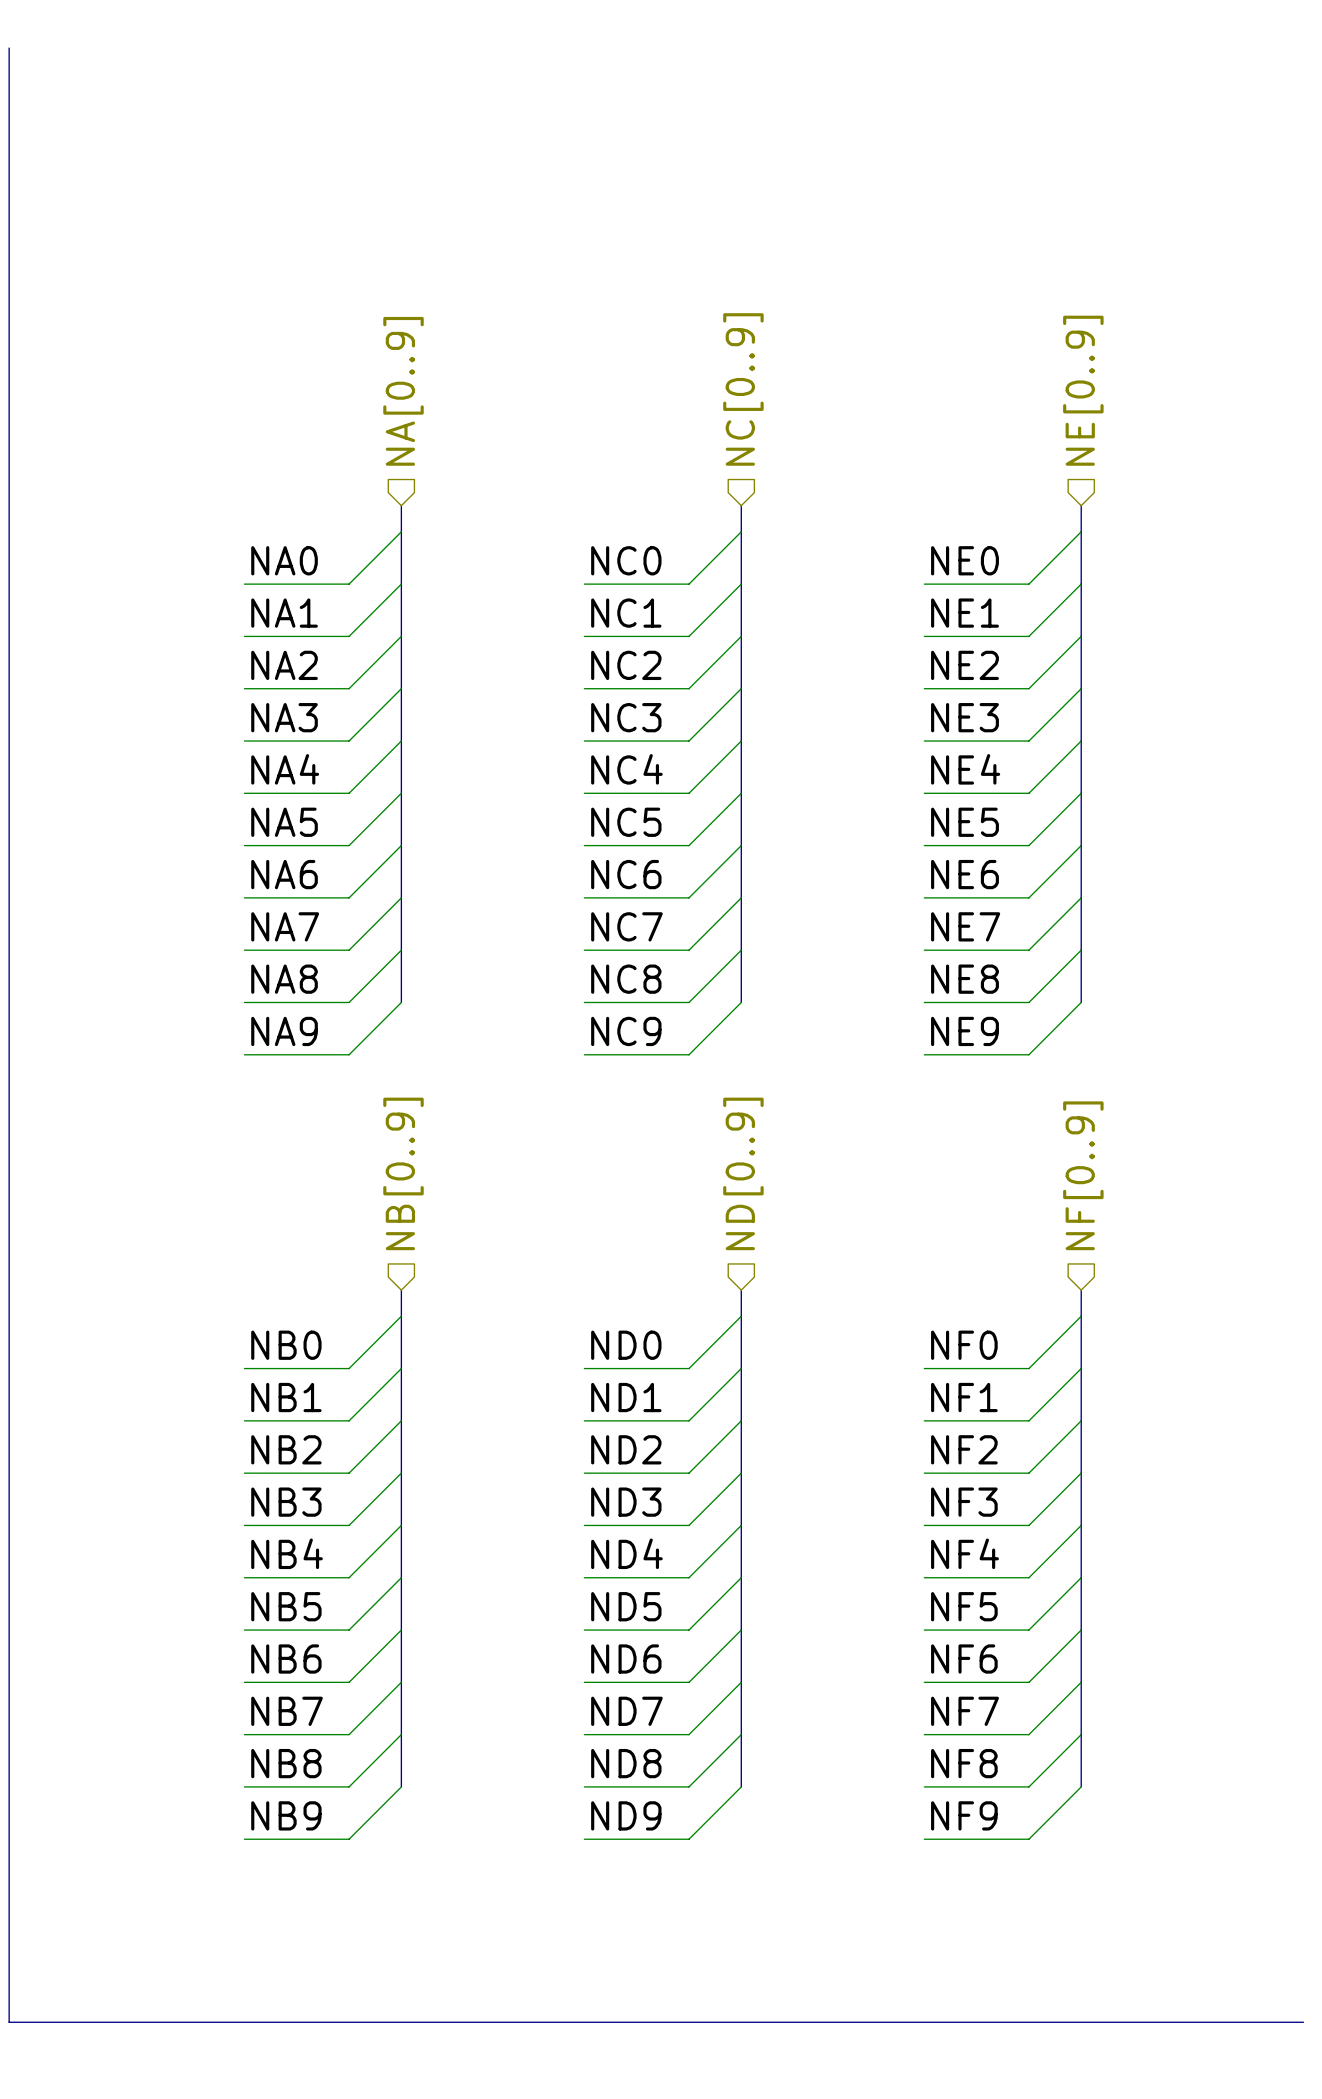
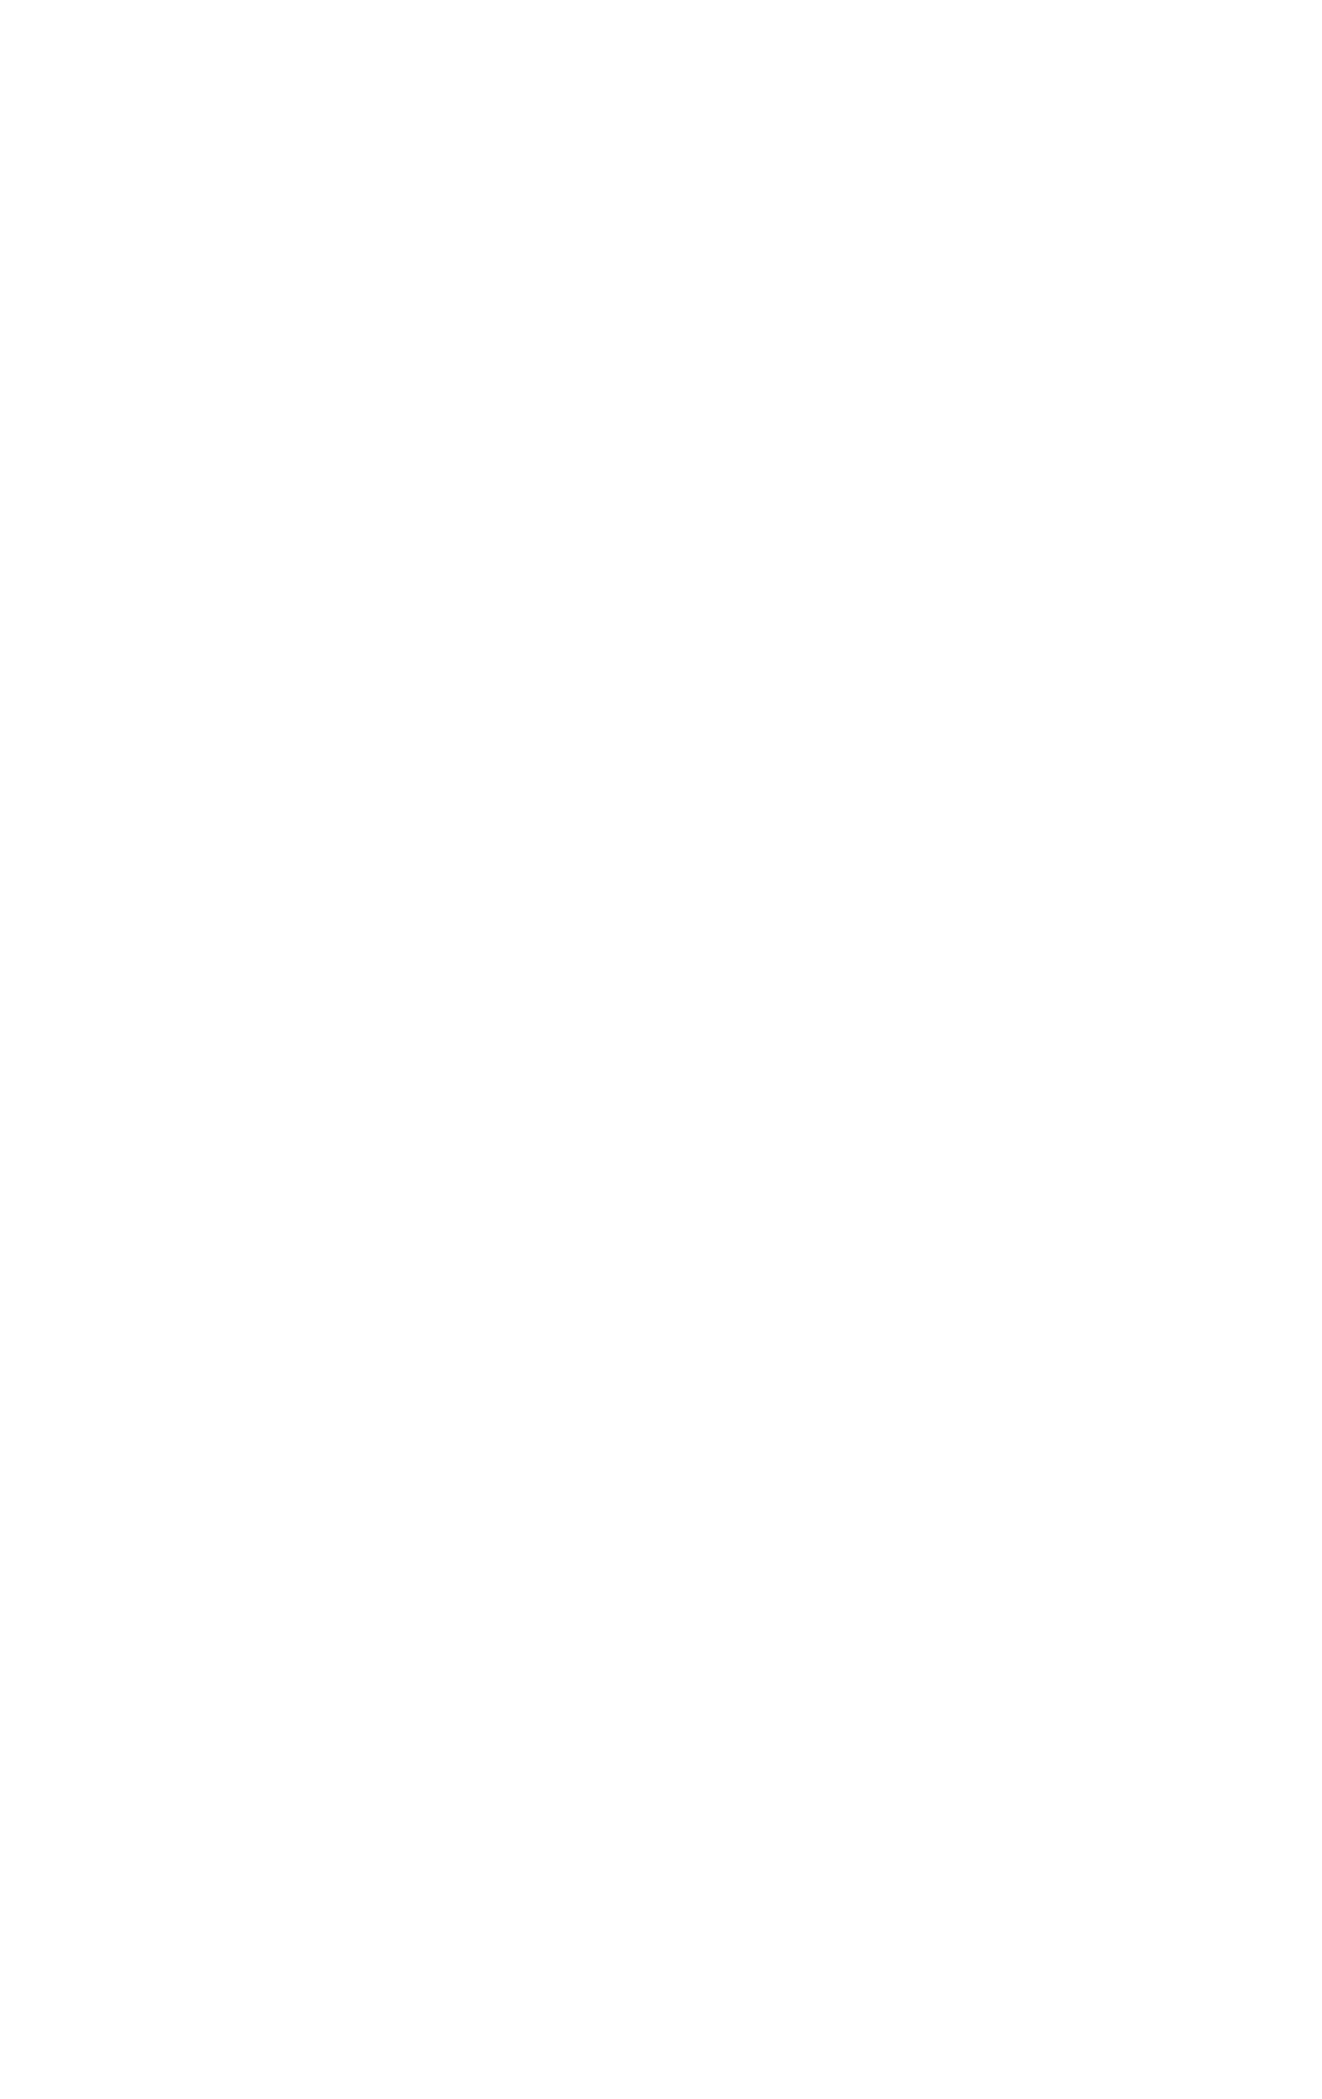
line: (9, 48) (9, 2022) (1303, 2022) -> none
hierarchical label: NC[0..9] (743, 389) -> none
hierarchical label: NE[0..9] (1083, 390) -> none
hierarchical label: NA[0..9] (403, 391) -> none
bus: (401, 505) (401, 1002) -> none
bus: (741, 505) (741, 1002) -> none
bus: (1081, 505) (1081, 1002) -> none
wire: (401, 531) (349, 584) (244, 584) -> none
wire: (741, 531) (689, 584) (584, 584) -> none
wire: (1081, 531) (1028, 584) (924, 584) -> none
label: NA0 (284, 560) -> none
label: NC0 (626, 560) -> none
label: NE0 (964, 560) -> none
wire: (401, 584) (349, 636) (244, 636) -> none
wire: (741, 584) (689, 636) (584, 636) -> none
wire: (1081, 584) (1028, 636) (924, 636) -> none
label: NA1 (284, 613) -> none
label: NC1 (626, 613) -> none
label: NE1 (964, 613) -> none
wire: (401, 636) (349, 688) (244, 688) -> none
wire: (741, 636) (689, 688) (584, 688) -> none
wire: (1081, 636) (1028, 688) (924, 688) -> none
label: NA2 (284, 665) -> none
label: NC2 (626, 665) -> none
label: NE2 (964, 665) -> none
wire: (401, 688) (349, 741) (244, 741) -> none
wire: (741, 688) (689, 741) (584, 741) -> none
wire: (1081, 688) (1028, 741) (924, 741) -> none
label: NA3 (284, 717) -> none
label: NC3 (626, 717) -> none
label: NE3 (964, 717) -> none
wire: (401, 741) (349, 793) (244, 793) -> none
wire: (741, 741) (689, 793) (584, 793) -> none
wire: (1081, 741) (1028, 793) (924, 793) -> none
label: NA4 (285, 769) -> none
label: NC4 (626, 769) -> none
label: NE4 (965, 769) -> none
wire: (401, 793) (349, 845) (244, 845) -> none
wire: (741, 793) (689, 845) (584, 845) -> none
wire: (1081, 793) (1028, 845) (924, 845) -> none
label: NA5 (284, 822) -> none
label: NC5 (626, 822) -> none
label: NE5 (964, 822) -> none
wire: (401, 845) (349, 897) (244, 897) -> none
wire: (741, 845) (689, 897) (584, 897) -> none
wire: (1081, 845) (1028, 897) (924, 897) -> none
label: NA6 (284, 874) -> none
label: NC6 (626, 874) -> none
label: NE6 (964, 874) -> none
wire: (401, 897) (349, 950) (244, 950) -> none
wire: (741, 897) (689, 950) (584, 950) -> none
wire: (1081, 897) (1028, 950) (924, 950) -> none
label: NA7 (285, 926) -> none
label: NC7 (626, 926) -> none
label: NE7 (965, 926) -> none
wire: (401, 950) (349, 1002) (244, 1002) -> none
wire: (741, 950) (689, 1002) (584, 1002) -> none
wire: (1081, 950) (1028, 1002) (924, 1002) -> none
label: NA8 (284, 979) -> none
label: NC8 (626, 979) -> none
label: NE8 (964, 979) -> none
wire: (401, 1002) (349, 1054) (244, 1054) -> none
wire: (741, 1002) (689, 1054) (584, 1054) -> none
wire: (1081, 1002) (1028, 1054) (924, 1054) -> none
label: NA9 (284, 1031) -> none
label: NC9 (626, 1031) -> none
label: NE9 (964, 1031) -> none
hierarchical label: NB[0..9] (403, 1173) -> none
hierarchical label: ND[0..9] (743, 1173) -> none
hierarchical label: NF[0..9] (1083, 1175) -> none
bus: (401, 1290) (401, 1786) -> none
bus: (741, 1290) (741, 1786) -> none
bus: (1081, 1290) (1081, 1786) -> none
wire: (401, 1316) (349, 1368) (244, 1368) -> none
wire: (741, 1316) (689, 1368) (584, 1368) -> none
wire: (1081, 1316) (1028, 1368) (924, 1368) -> none
label: NB0 (286, 1345) -> none
label: ND0 (626, 1345) -> none
label: NF0 (964, 1345) -> none
wire: (401, 1368) (349, 1420) (244, 1420) -> none
wire: (741, 1368) (689, 1420) (584, 1420) -> none
wire: (1081, 1368) (1028, 1420) (924, 1420) -> none
label: NB1 (286, 1397) -> none
label: ND1 (626, 1397) -> none
label: NF1 (964, 1397) -> none
wire: (401, 1420) (349, 1473) (244, 1473) -> none
wire: (741, 1420) (689, 1473) (584, 1473) -> none
wire: (1081, 1420) (1028, 1473) (924, 1473) -> none
label: NB2 (286, 1449) -> none
label: ND2 (626, 1449) -> none
label: NF2 (964, 1449) -> none
wire: (401, 1473) (349, 1525) (244, 1525) -> none
wire: (741, 1473) (689, 1525) (584, 1525) -> none
wire: (1081, 1473) (1028, 1525) (924, 1525) -> none
label: NB3 (286, 1502) -> none
label: ND3 (626, 1502) -> none
label: NF3 (964, 1502) -> none
wire: (401, 1525) (349, 1577) (244, 1577) -> none
wire: (741, 1525) (689, 1577) (584, 1577) -> none
wire: (1081, 1525) (1028, 1577) (924, 1577) -> none
label: NB4 (287, 1553) -> none
label: ND4 (626, 1553) -> none
label: NF4 (964, 1553) -> none
wire: (401, 1577) (349, 1630) (244, 1630) -> none
wire: (741, 1577) (689, 1630) (584, 1630) -> none
wire: (1081, 1577) (1028, 1630) (924, 1630) -> none
label: NB5 (286, 1606) -> none
label: ND5 (626, 1606) -> none
label: NF5 (964, 1606) -> none
wire: (401, 1630) (349, 1682) (244, 1682) -> none
wire: (741, 1630) (689, 1682) (584, 1682) -> none
wire: (1081, 1630) (1028, 1682) (924, 1682) -> none
label: NB6 (286, 1659) -> none
label: ND6 (626, 1659) -> none
label: NF6 (964, 1659) -> none
wire: (401, 1682) (349, 1734) (244, 1734) -> none
wire: (741, 1682) (689, 1734) (584, 1734) -> none
wire: (1081, 1682) (1028, 1734) (924, 1734) -> none
label: NB7 (287, 1711) -> none
label: ND7 (626, 1711) -> none
label: NF7 (964, 1711) -> none
wire: (401, 1734) (349, 1786) (244, 1786) -> none
wire: (741, 1734) (689, 1786) (584, 1786) -> none
wire: (1081, 1734) (1028, 1786) (924, 1786) -> none
label: NB8 (286, 1763) -> none
label: ND8 (626, 1763) -> none
label: NF8 (964, 1763) -> none
wire: (401, 1786) (349, 1839) (244, 1839) -> none
wire: (741, 1786) (689, 1839) (584, 1839) -> none
wire: (1081, 1786) (1028, 1839) (924, 1839) -> none
label: NB9 (286, 1815) -> none
label: ND9 (626, 1815) -> none
label: NF9 (964, 1815) -> none

